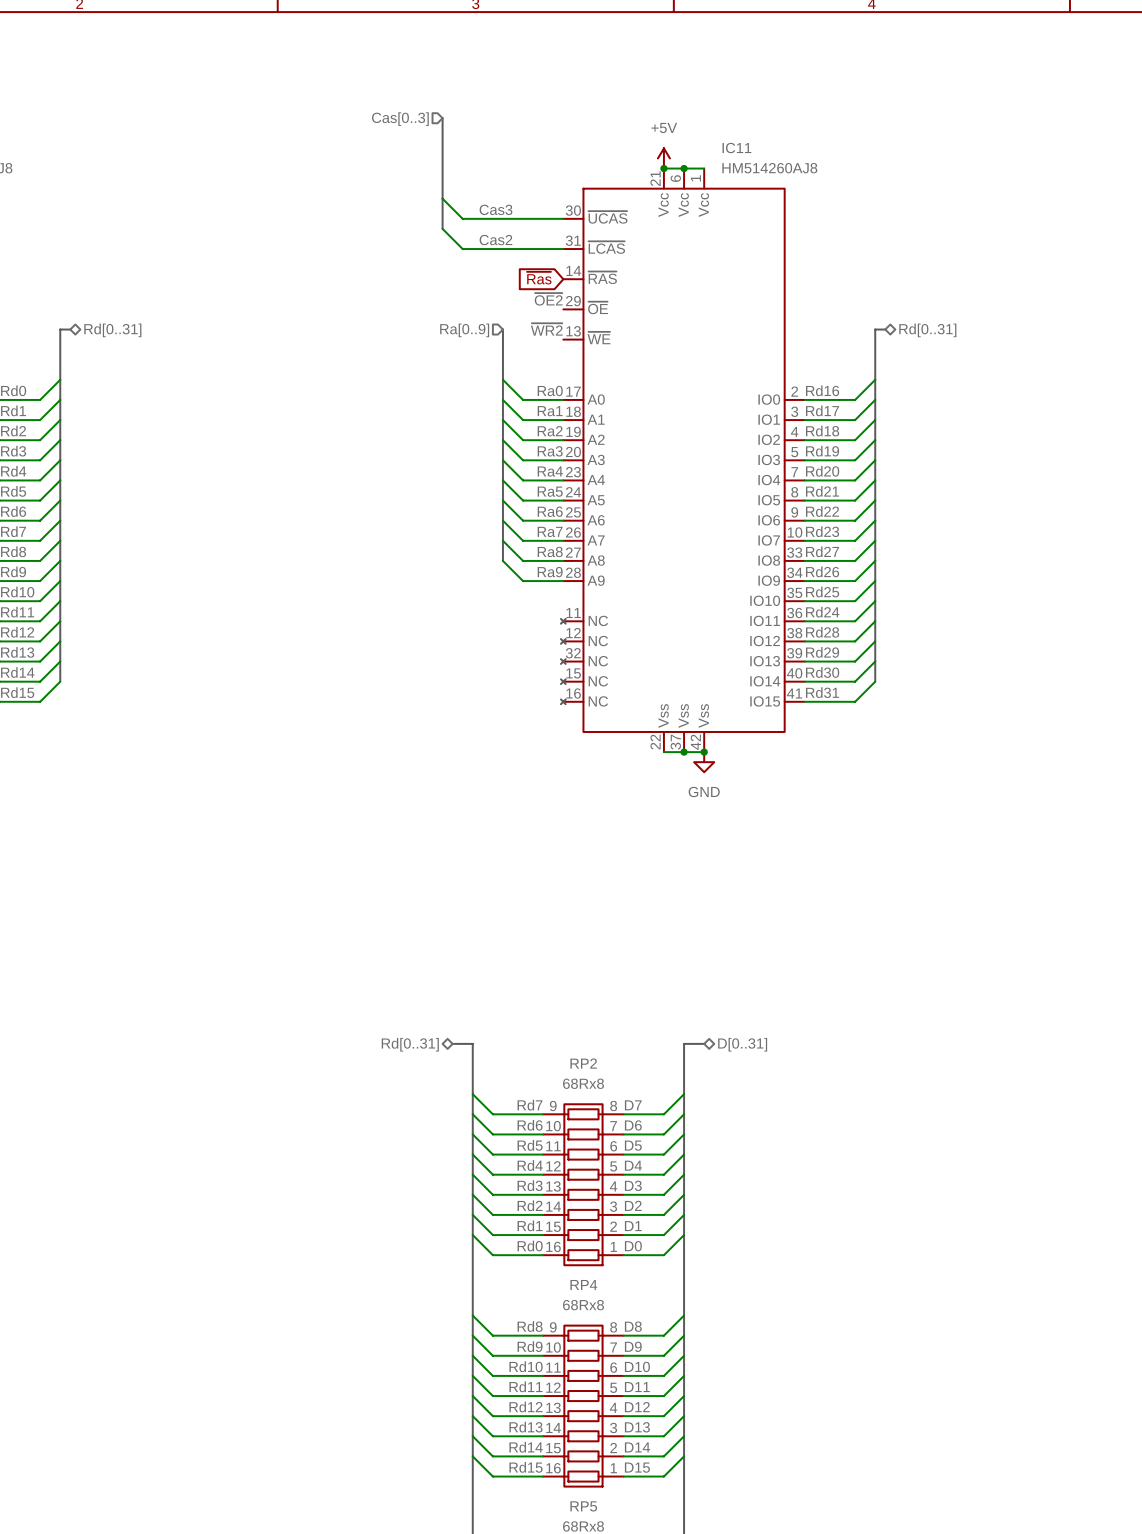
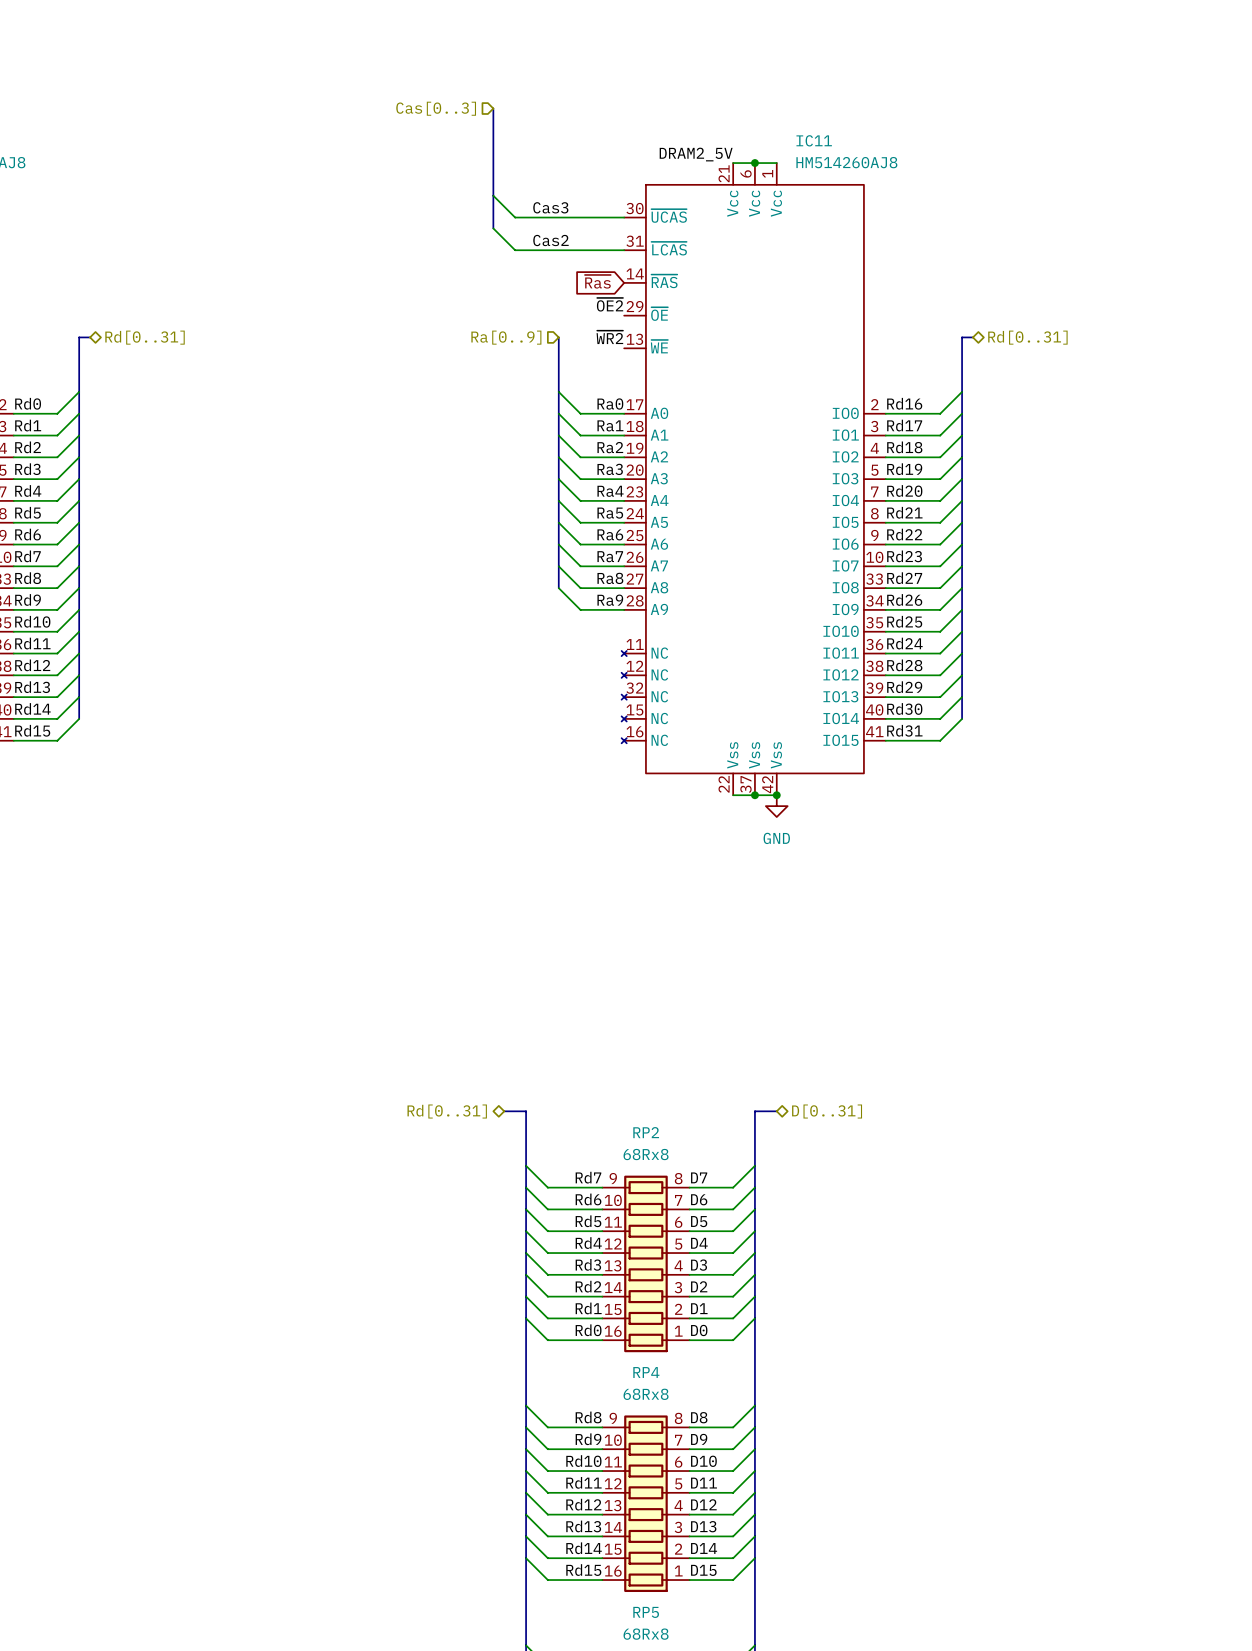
power symbol: +5V (663, 158) -> none
label: none -> DRAM2_5V (696, 154)
junction: (663, 168) -> none

